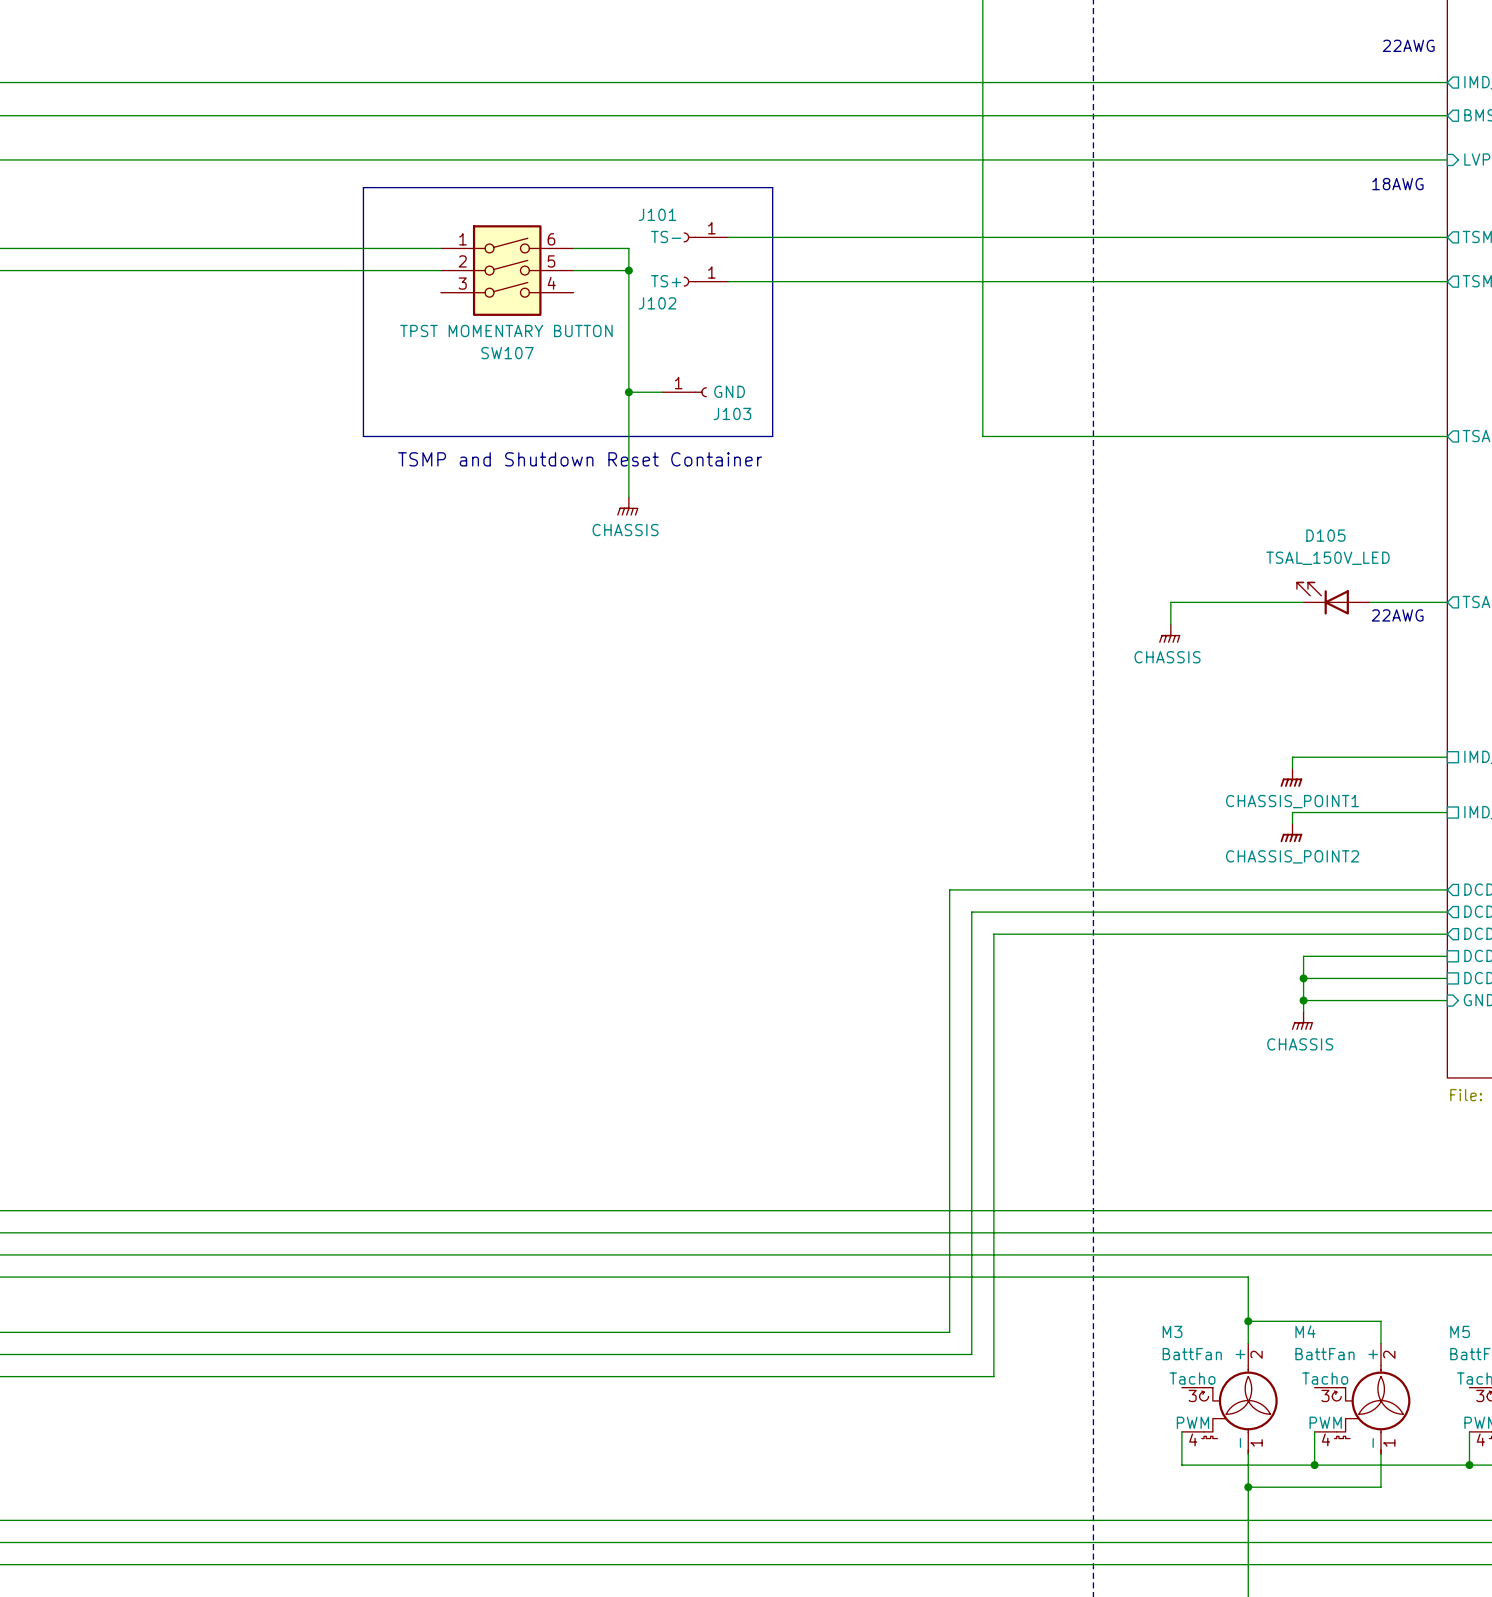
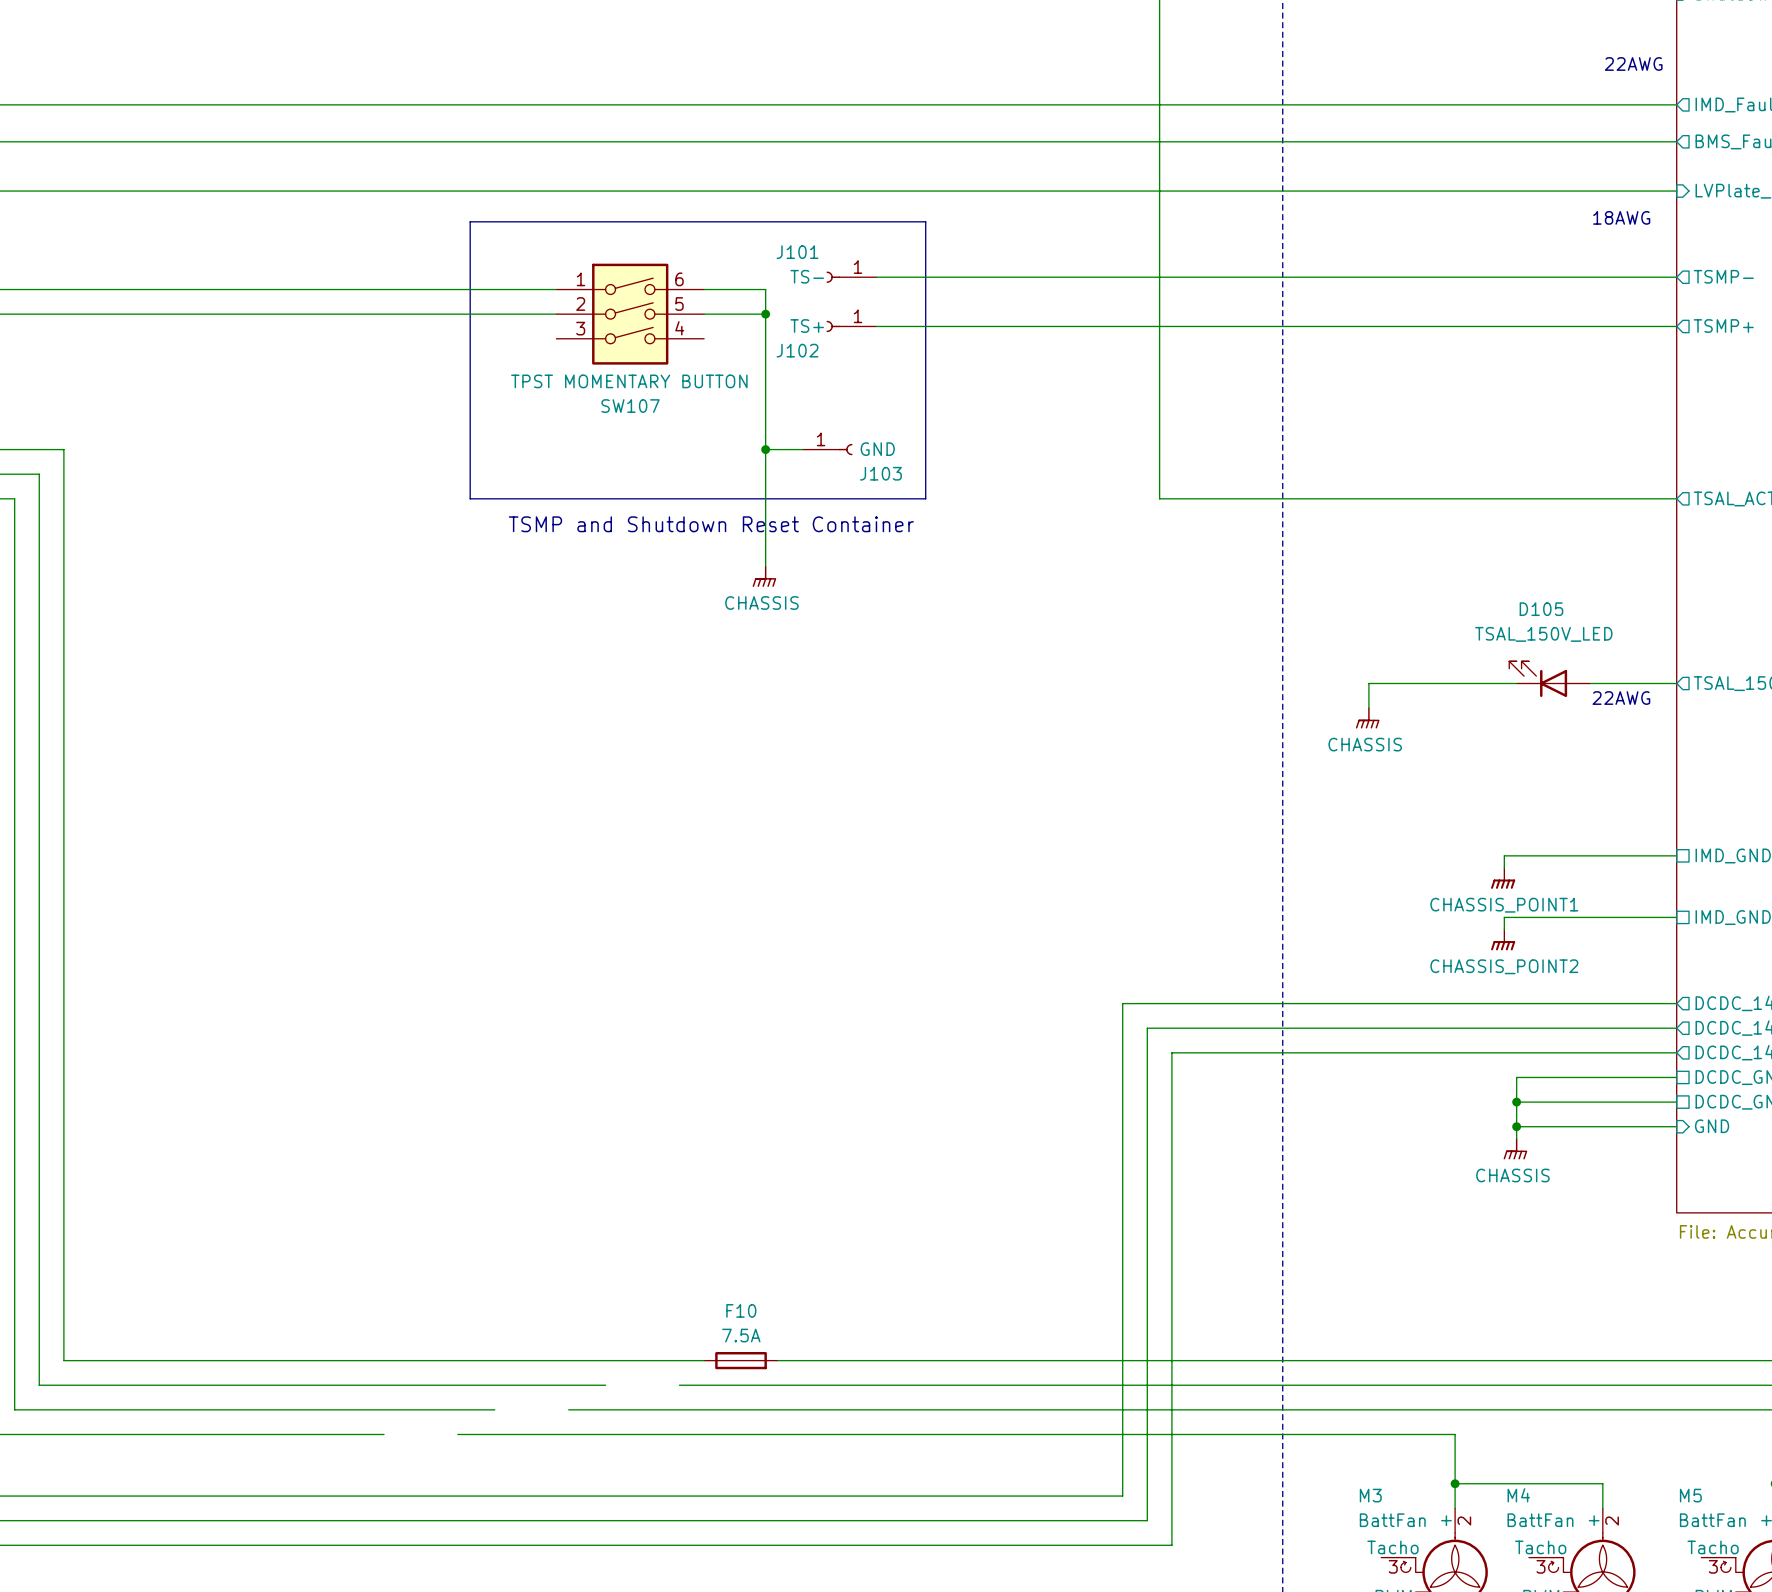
F10: none -> 7.5A (741, 1360)
wire: (485, 1232) (551, 1232) -> none
wire: (385, 1254) (451, 1254) -> none
wire: (286, 1277) (352, 1277) -> none

